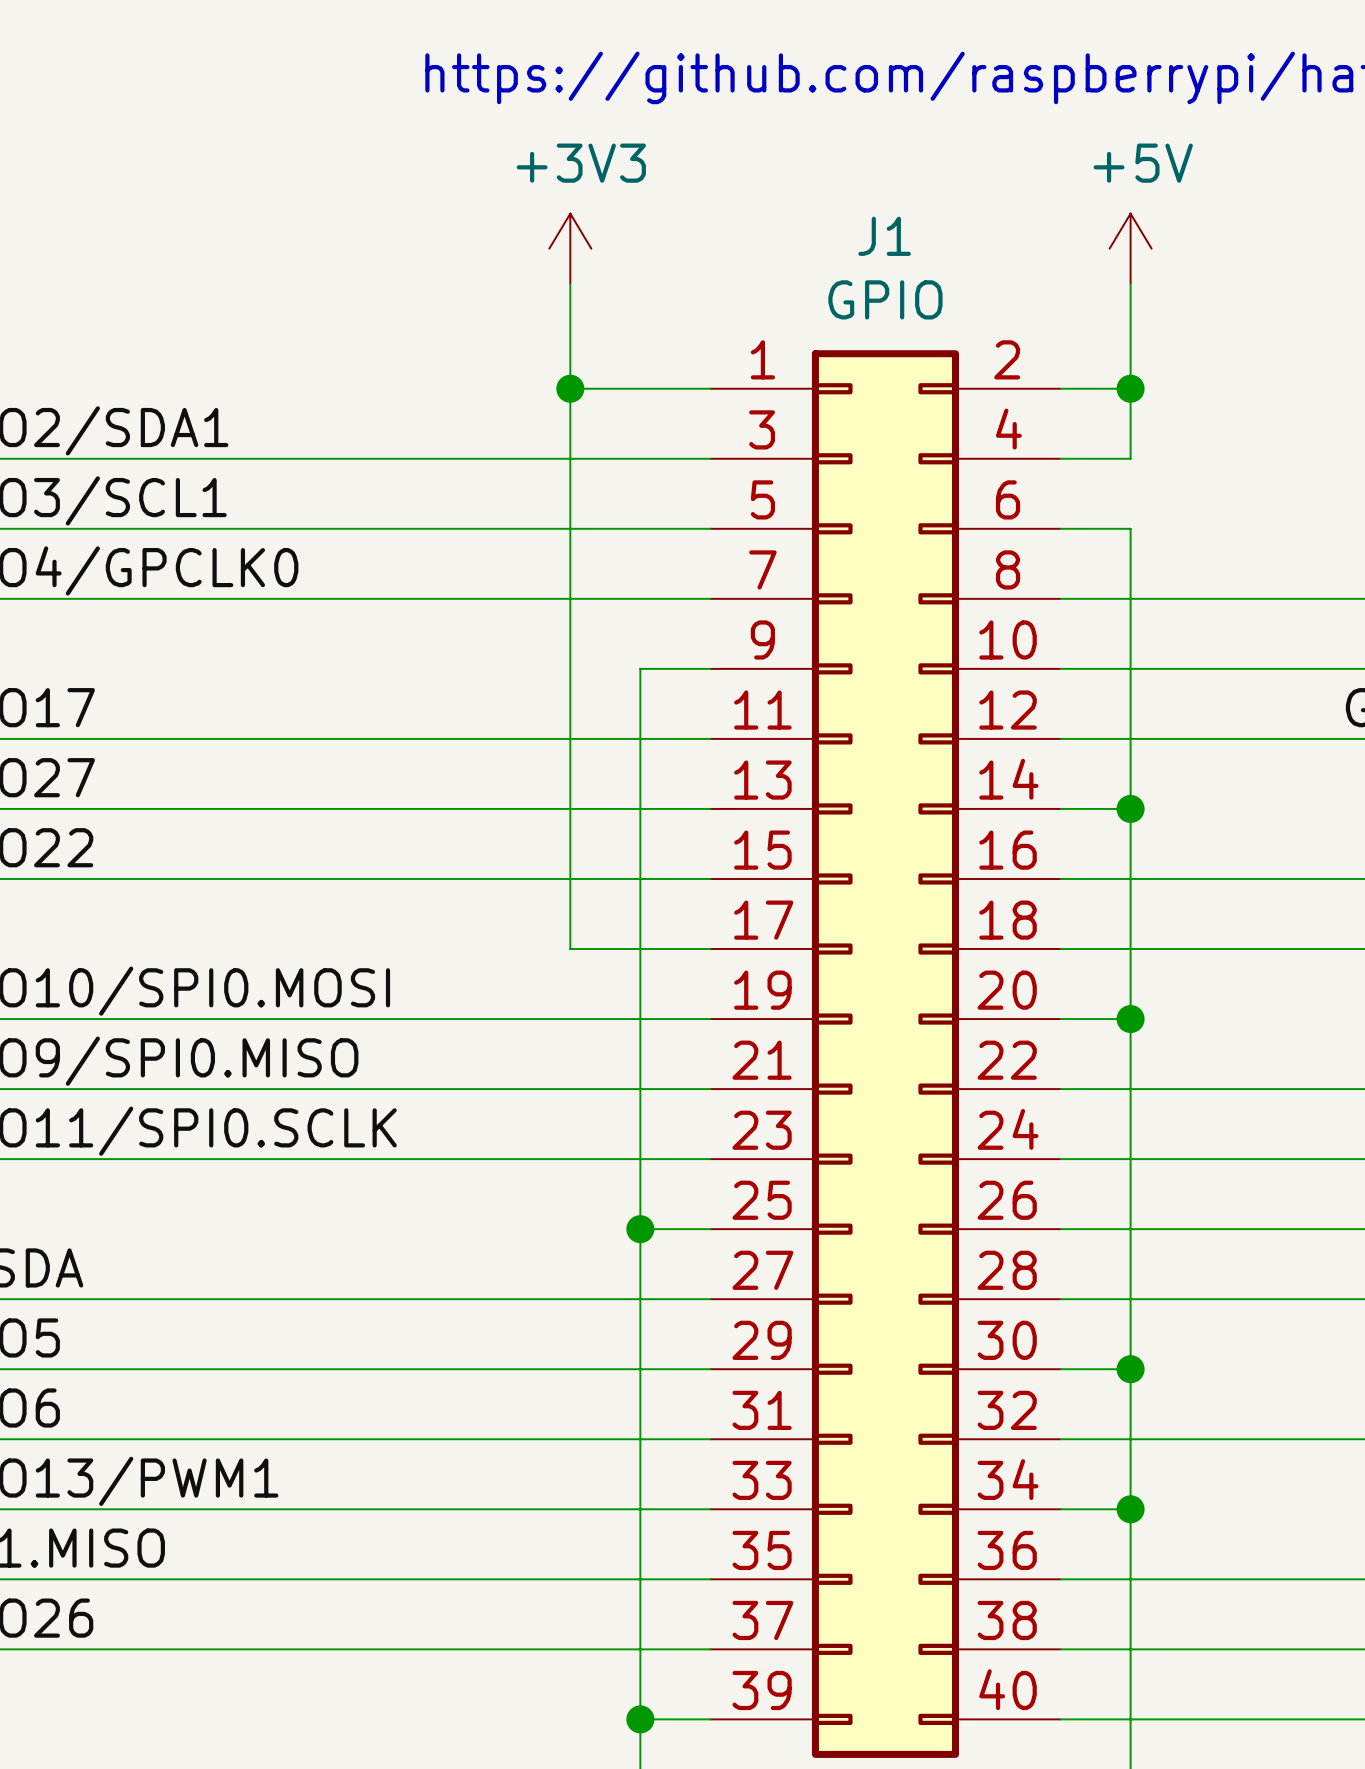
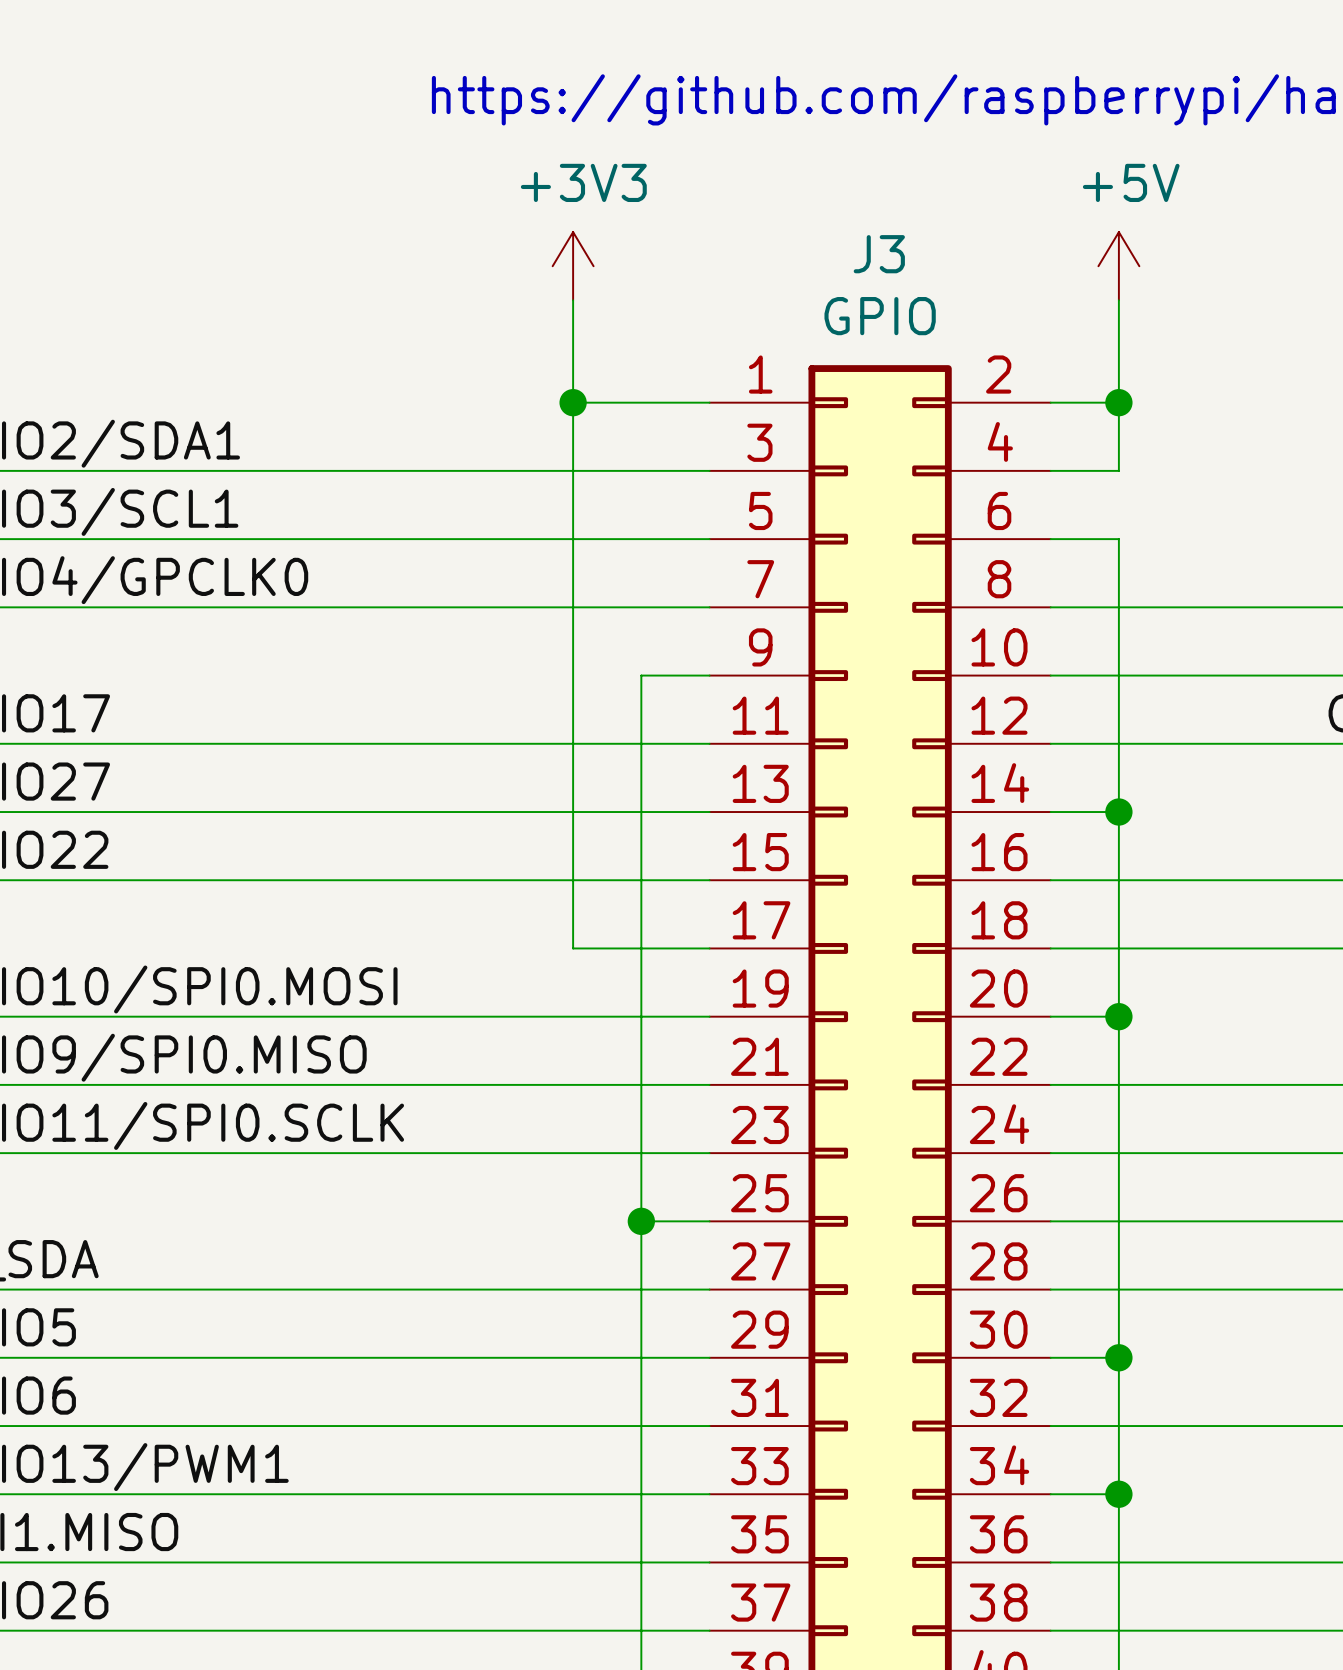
J1 name: J1 (884, 236) -> J3 (879, 254)

